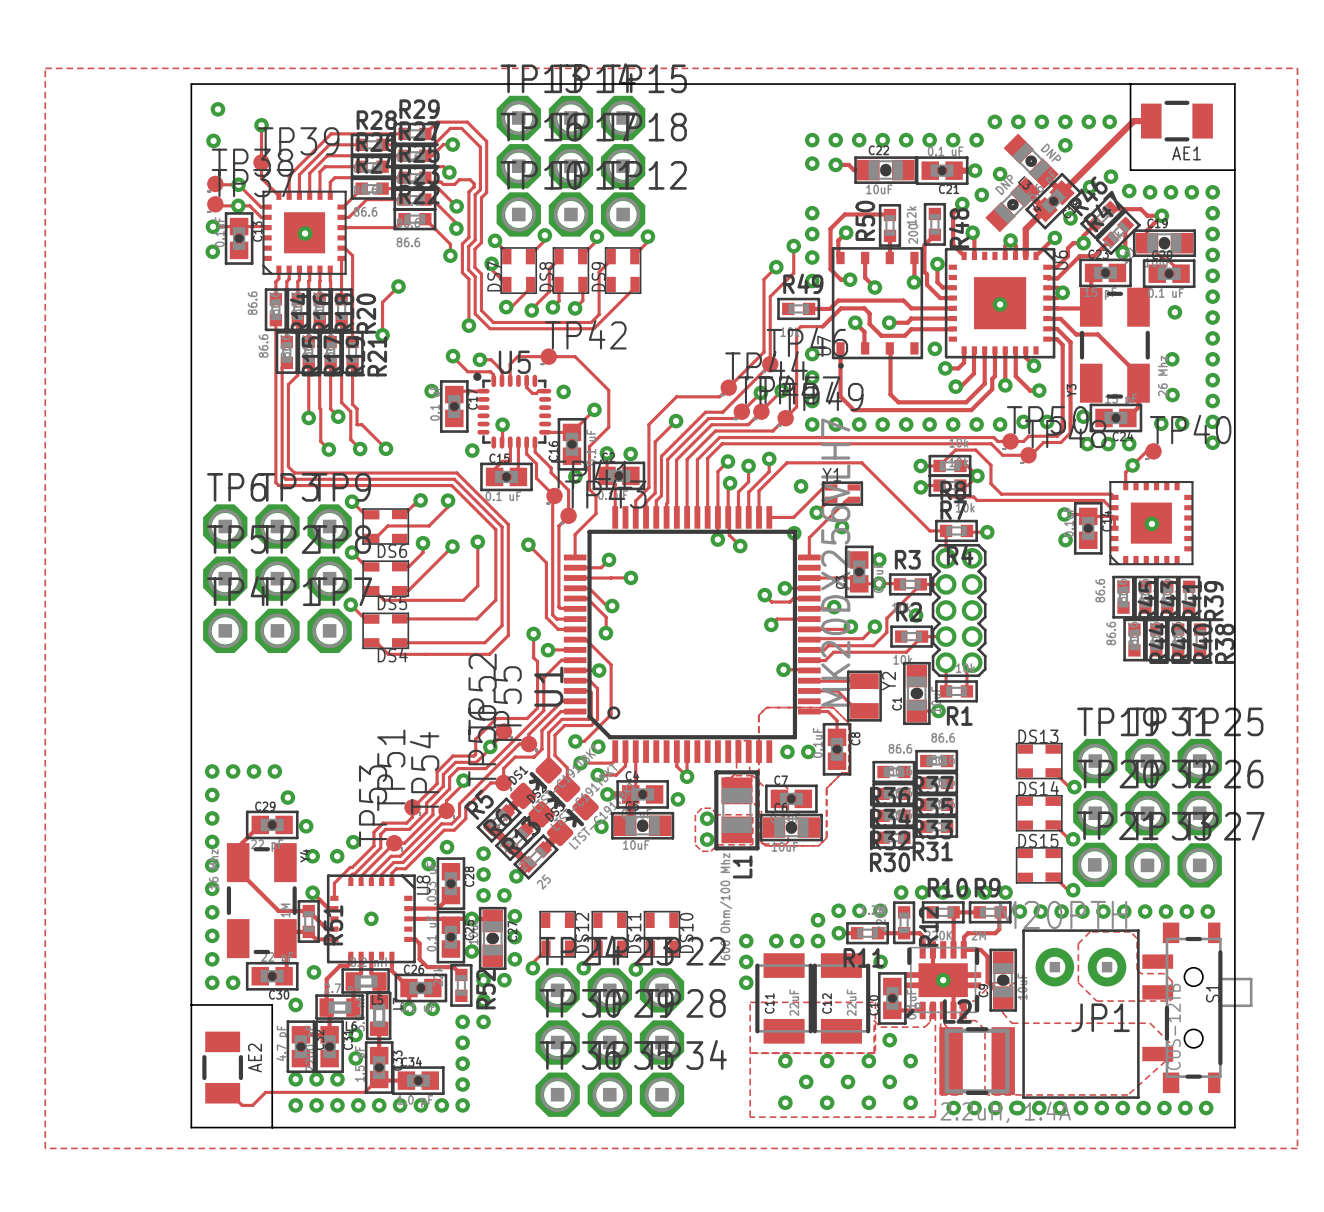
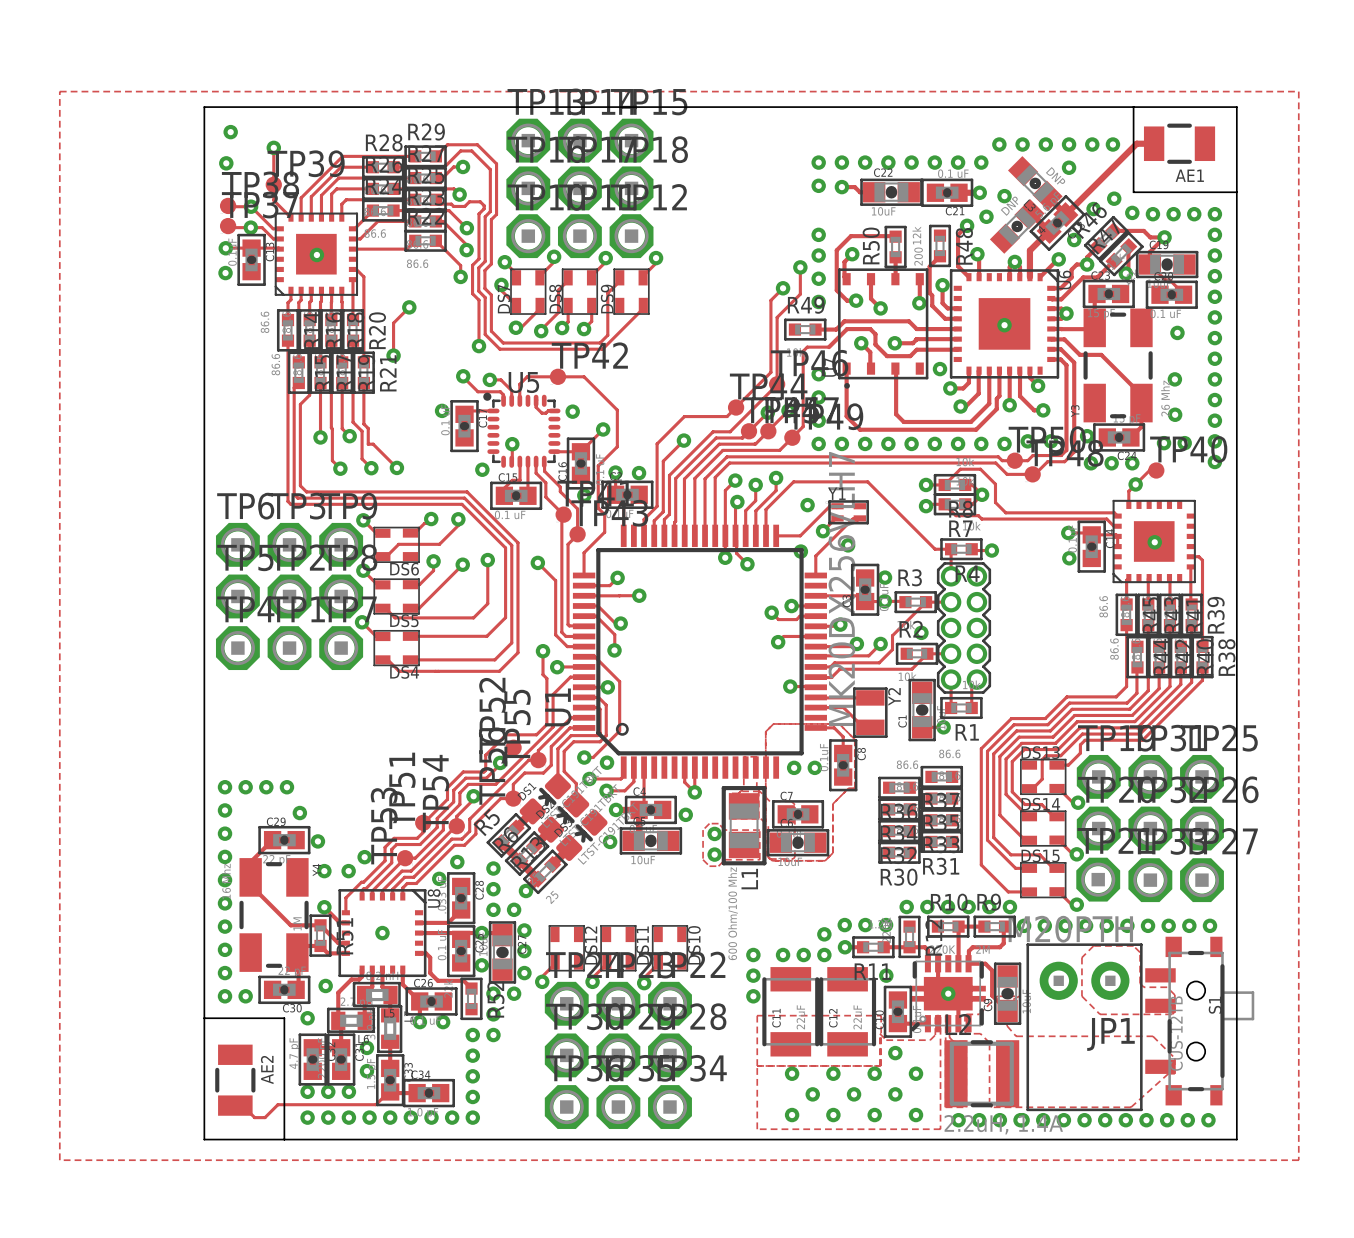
track: none -> (1190, 556) (1198, 556) (1202, 560) (1202, 646)
track: none -> (1190, 566) (1191, 604)
track: none -> (1128, 578) (1126, 580) (1126, 604)
track: none -> (1149, 578) (1148, 604)
track: none -> (1169, 578) (1169, 604)
track: none -> (1126, 625) (1126, 686) (1116, 696) (1066, 696) (1045, 718) (1011, 718) (981, 748) (981, 864) (1008, 891) (1029, 891)
track: none -> (1148, 625) (1148, 690) (1129, 709) (1072, 709) (1050, 730) (1016, 730) (993, 753) (993, 837) (1010, 854) (1039, 854) (1053, 868) (1057, 868)
track: none -> (1169, 625) (1169, 686) (1134, 721) (1077, 721) (1055, 743) (1021, 743) (1006, 759) (1006, 794) (1029, 816)
track: none -> (1191, 625) (1191, 682) (1140, 734) (1082, 734) (1060, 755) (1046, 755) (1042, 759) (1042, 779) (1032, 788) (1029, 788)
track: none -> (1137, 667) (1136, 693) (1127, 703) (1069, 703) (1047, 724) (1014, 724) (987, 751) (987, 840) (1015, 868) (1029, 868)
track: none -> (1159, 667) (1159, 688) (1132, 715) (1074, 715) (1053, 737) (1019, 737) (999, 756) (999, 815) (1025, 840) (1029, 840)
track: none -> (1180, 667) (1180, 684) (1137, 727) (1079, 727) (1058, 749) (1024, 749) (1012, 761) (1012, 791) (1024, 804) (1041, 804) (1053, 816) (1057, 816)
track: none -> (1202, 667) (1202, 680) (1142, 740) (1085, 740) (1080, 744) (1080, 753) (1068, 765) (1057, 765)

